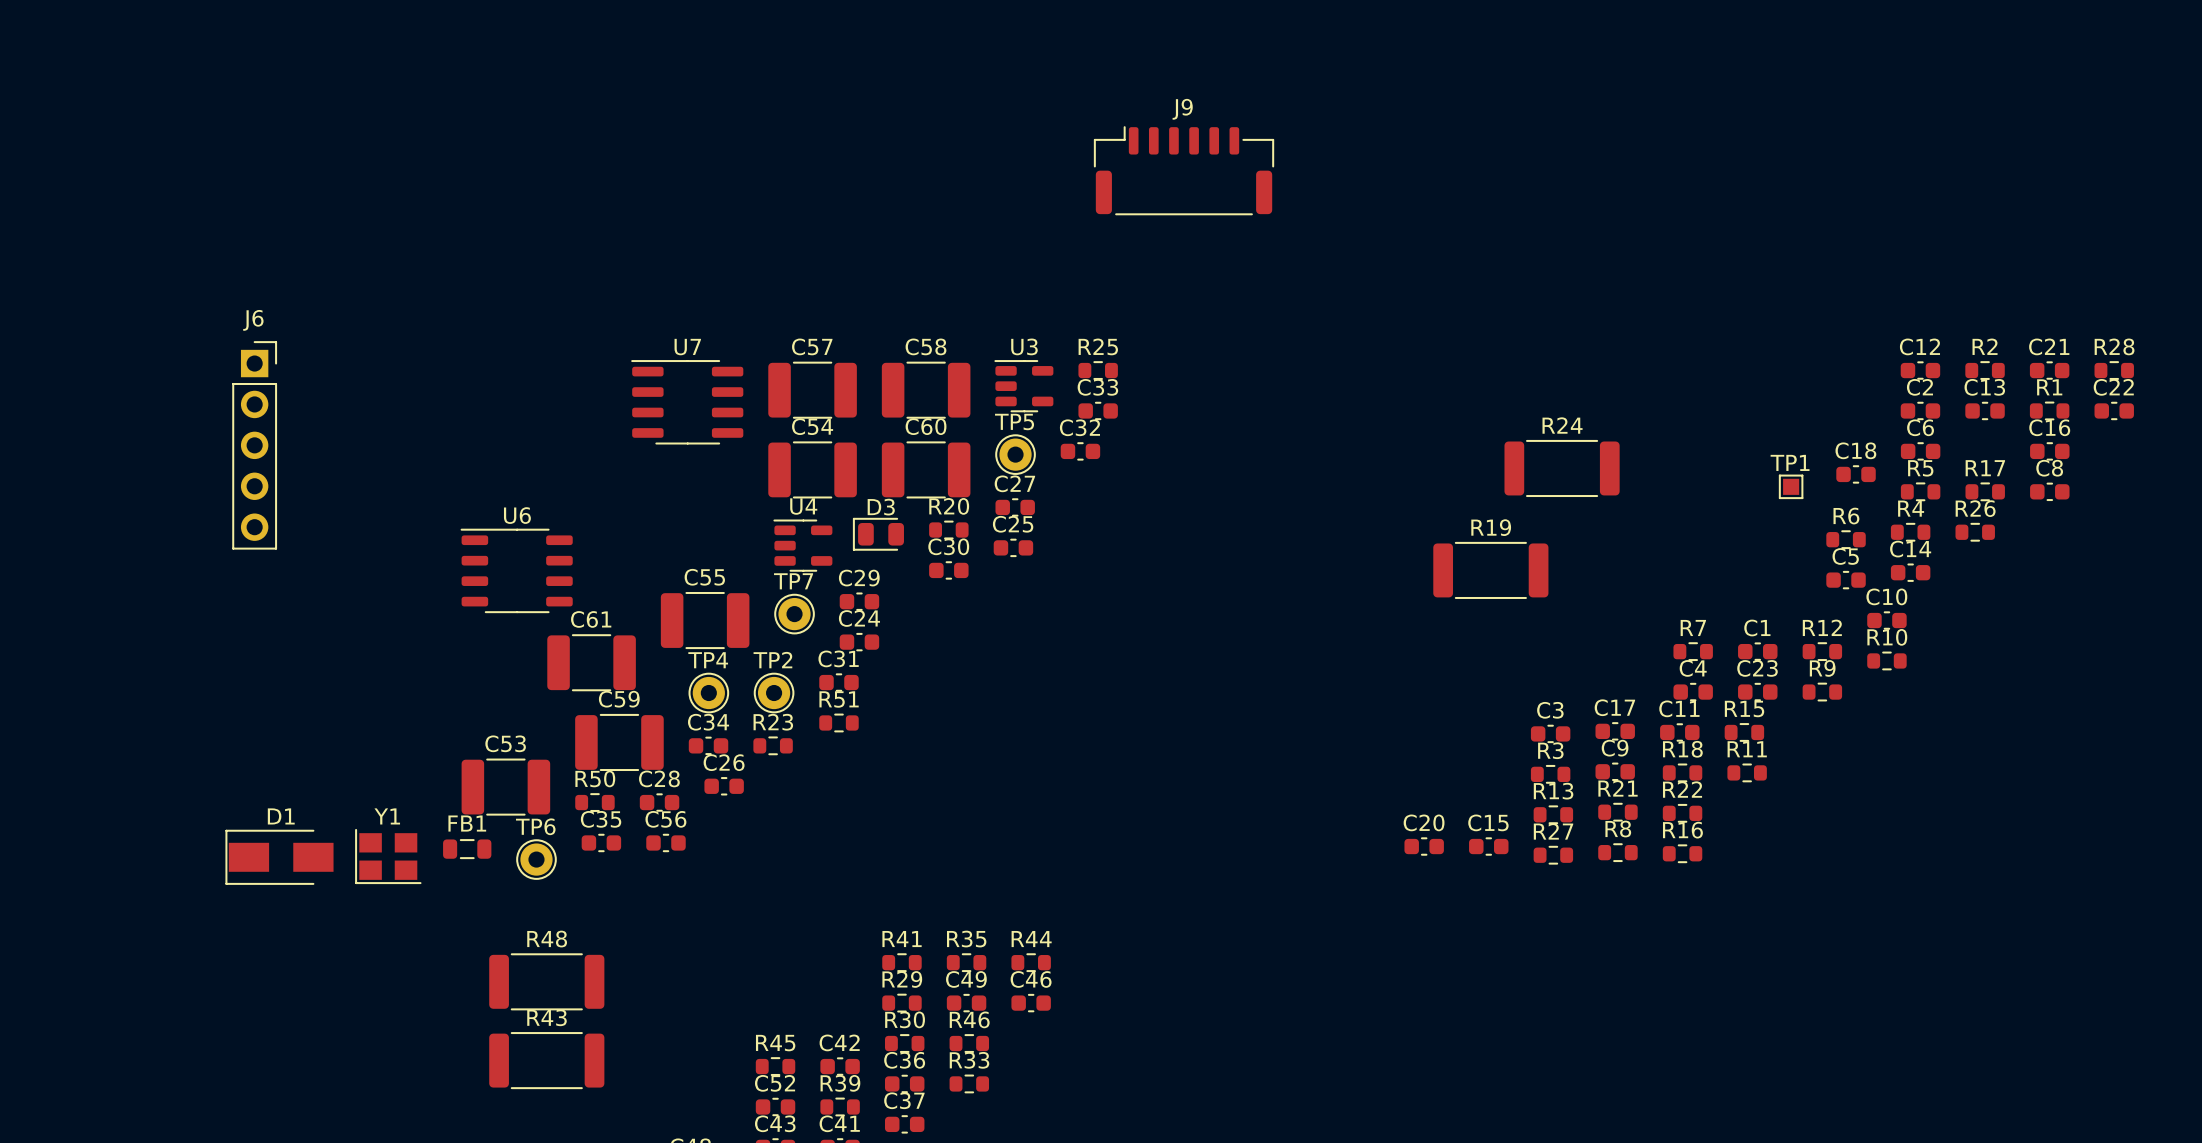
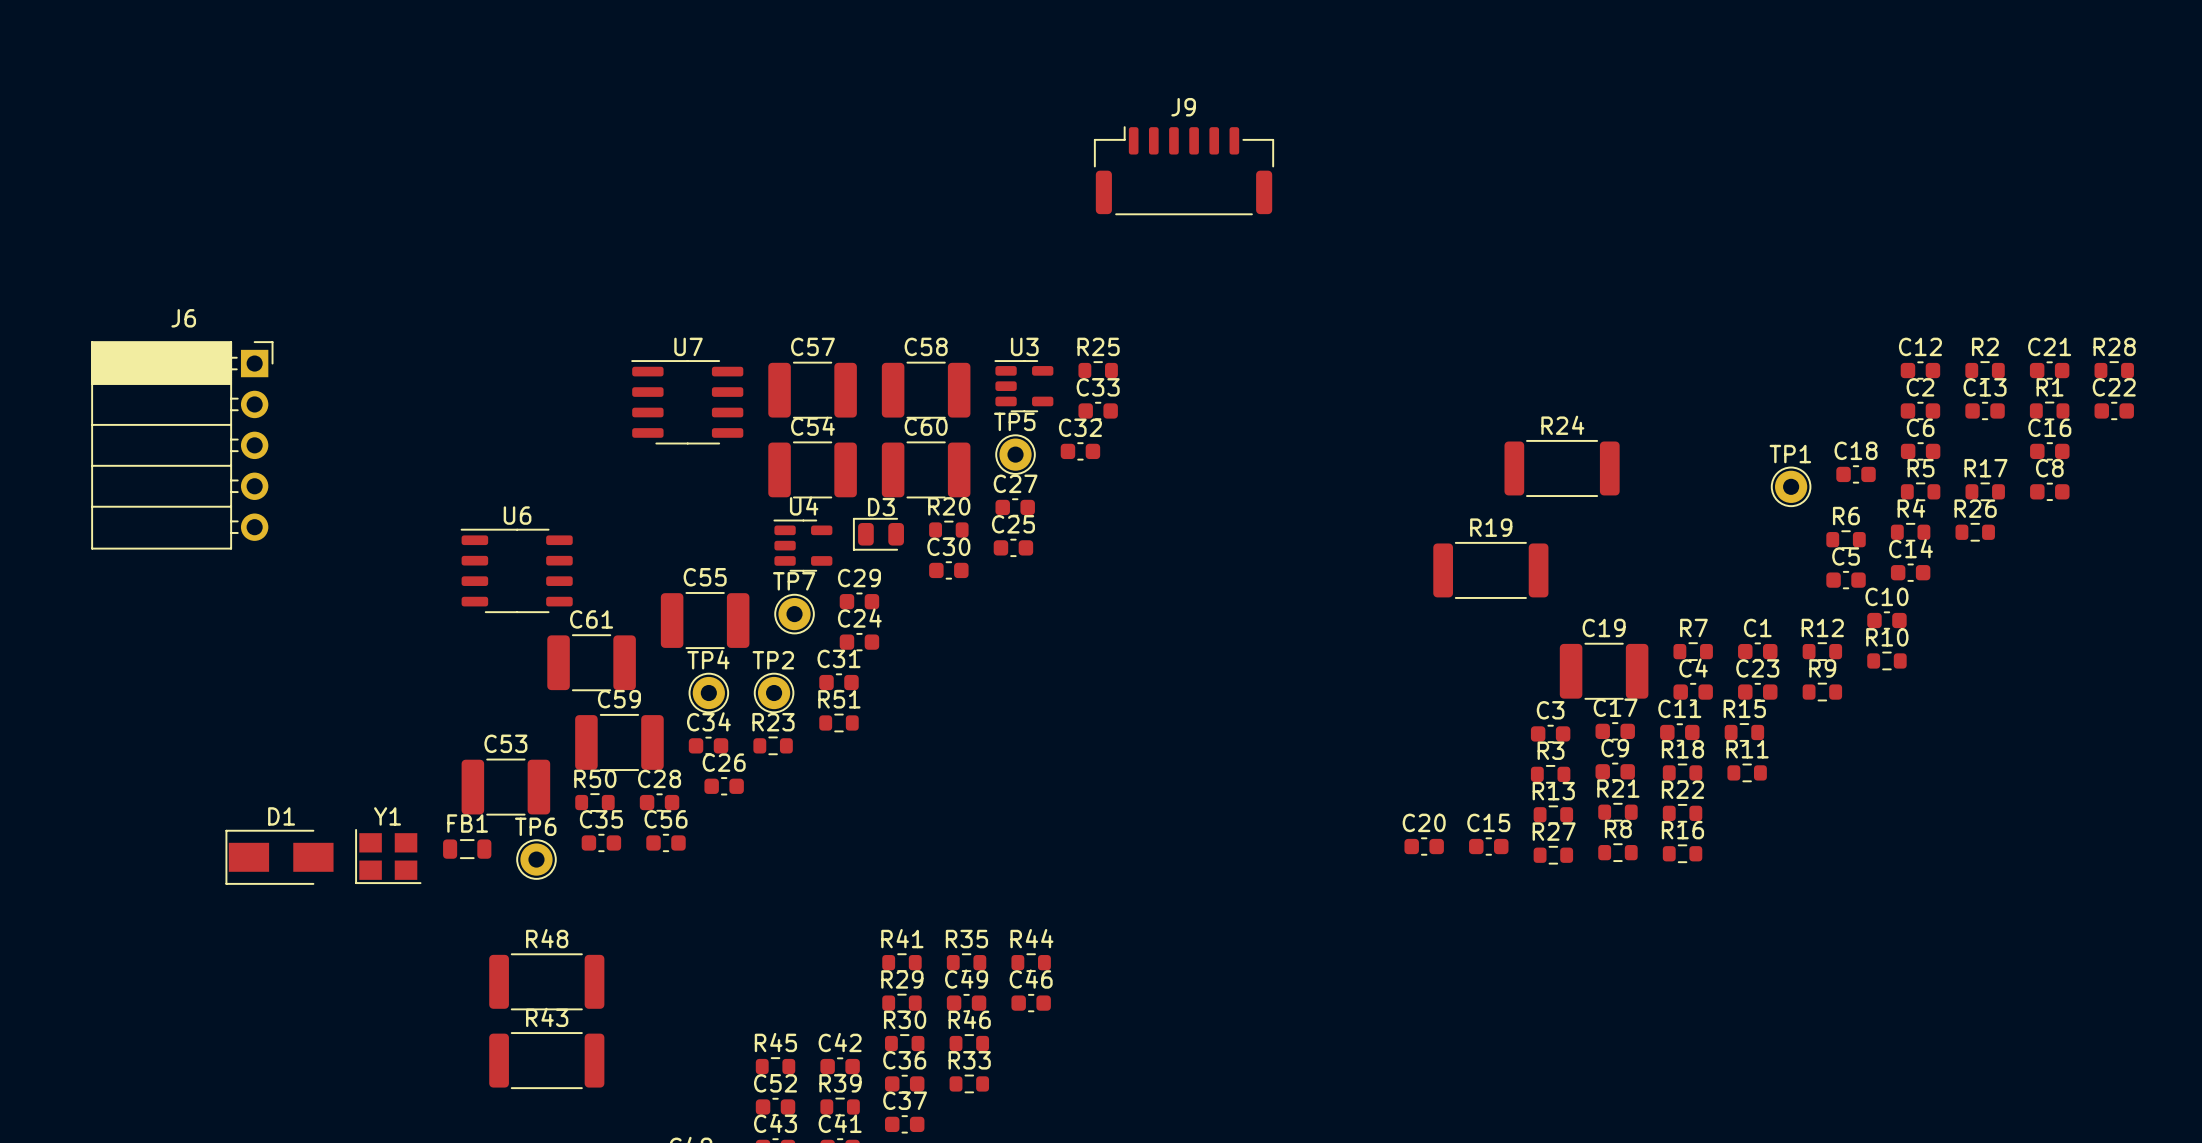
J6 footprint: [232, 341, 278, 550] -> [91, 341, 274, 550]
TP1 footprint: [1778, 474, 1804, 500] -> [1770, 466, 1812, 508]
C19: none -> (1604, 671)

